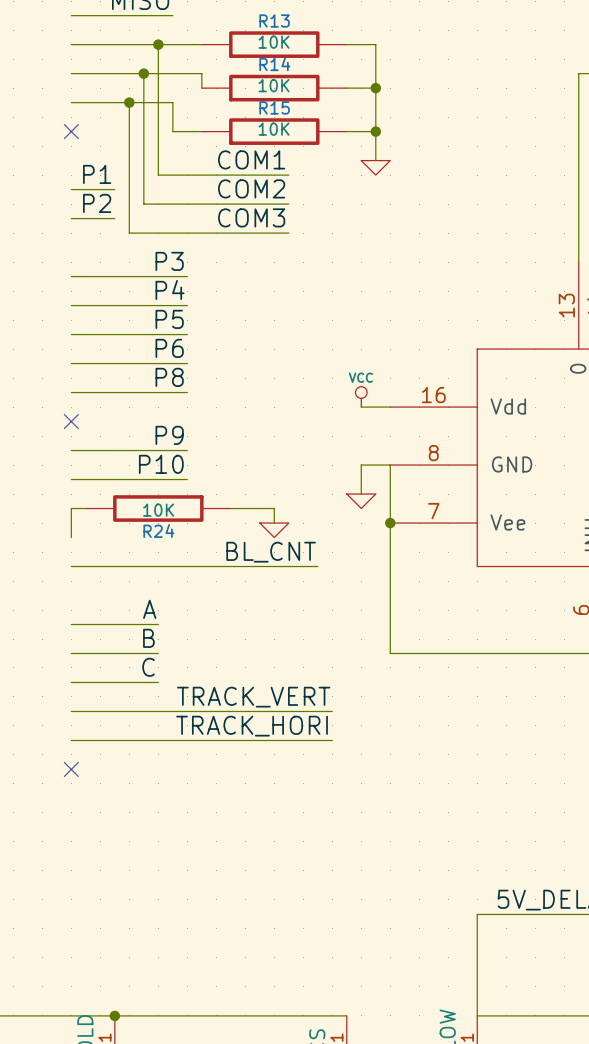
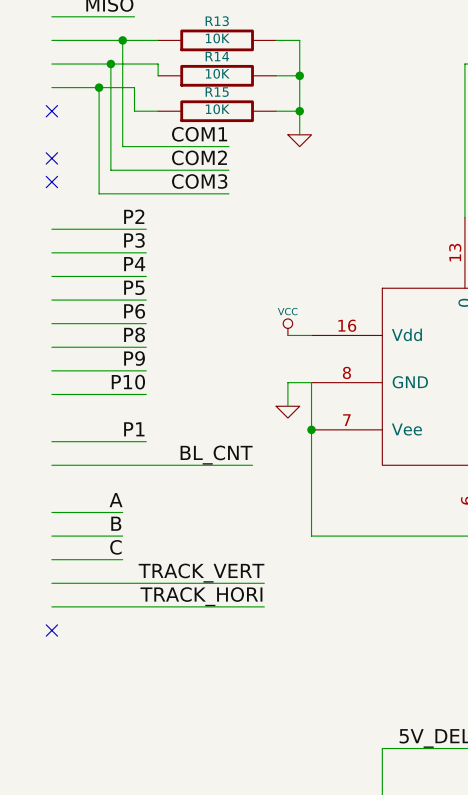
label: P1 (97, 174) -> none
wire: (71, 189) (114, 189) -> none
no-connect mark: none -> (51, 158)
label: P2 (97, 203) -> none
wire: (71, 218) (114, 218) -> none
no-connect mark: none -> (51, 182)
label: P3 (169, 261) -> P2 (134, 216)
label: P4 (170, 289) -> P3 (134, 240)
label: P5 (169, 319) -> P4 (134, 264)
label: P6 (169, 348) -> P5 (134, 287)
label: P8 (169, 377) -> P6 (134, 311)
label: none -> P8 (134, 334)
wire: none -> (51, 347) (146, 347)
no-connect mark: (71, 421) -> none
wire: (85, 508) (71, 508) (71, 537) -> (146, 441) (51, 441)
R24: 10K (158, 508) -> none
wire: (230, 508) (274, 508) (274, 523) -> none
label: none -> P1 (134, 429)
power symbol: (274, 530) -> none

